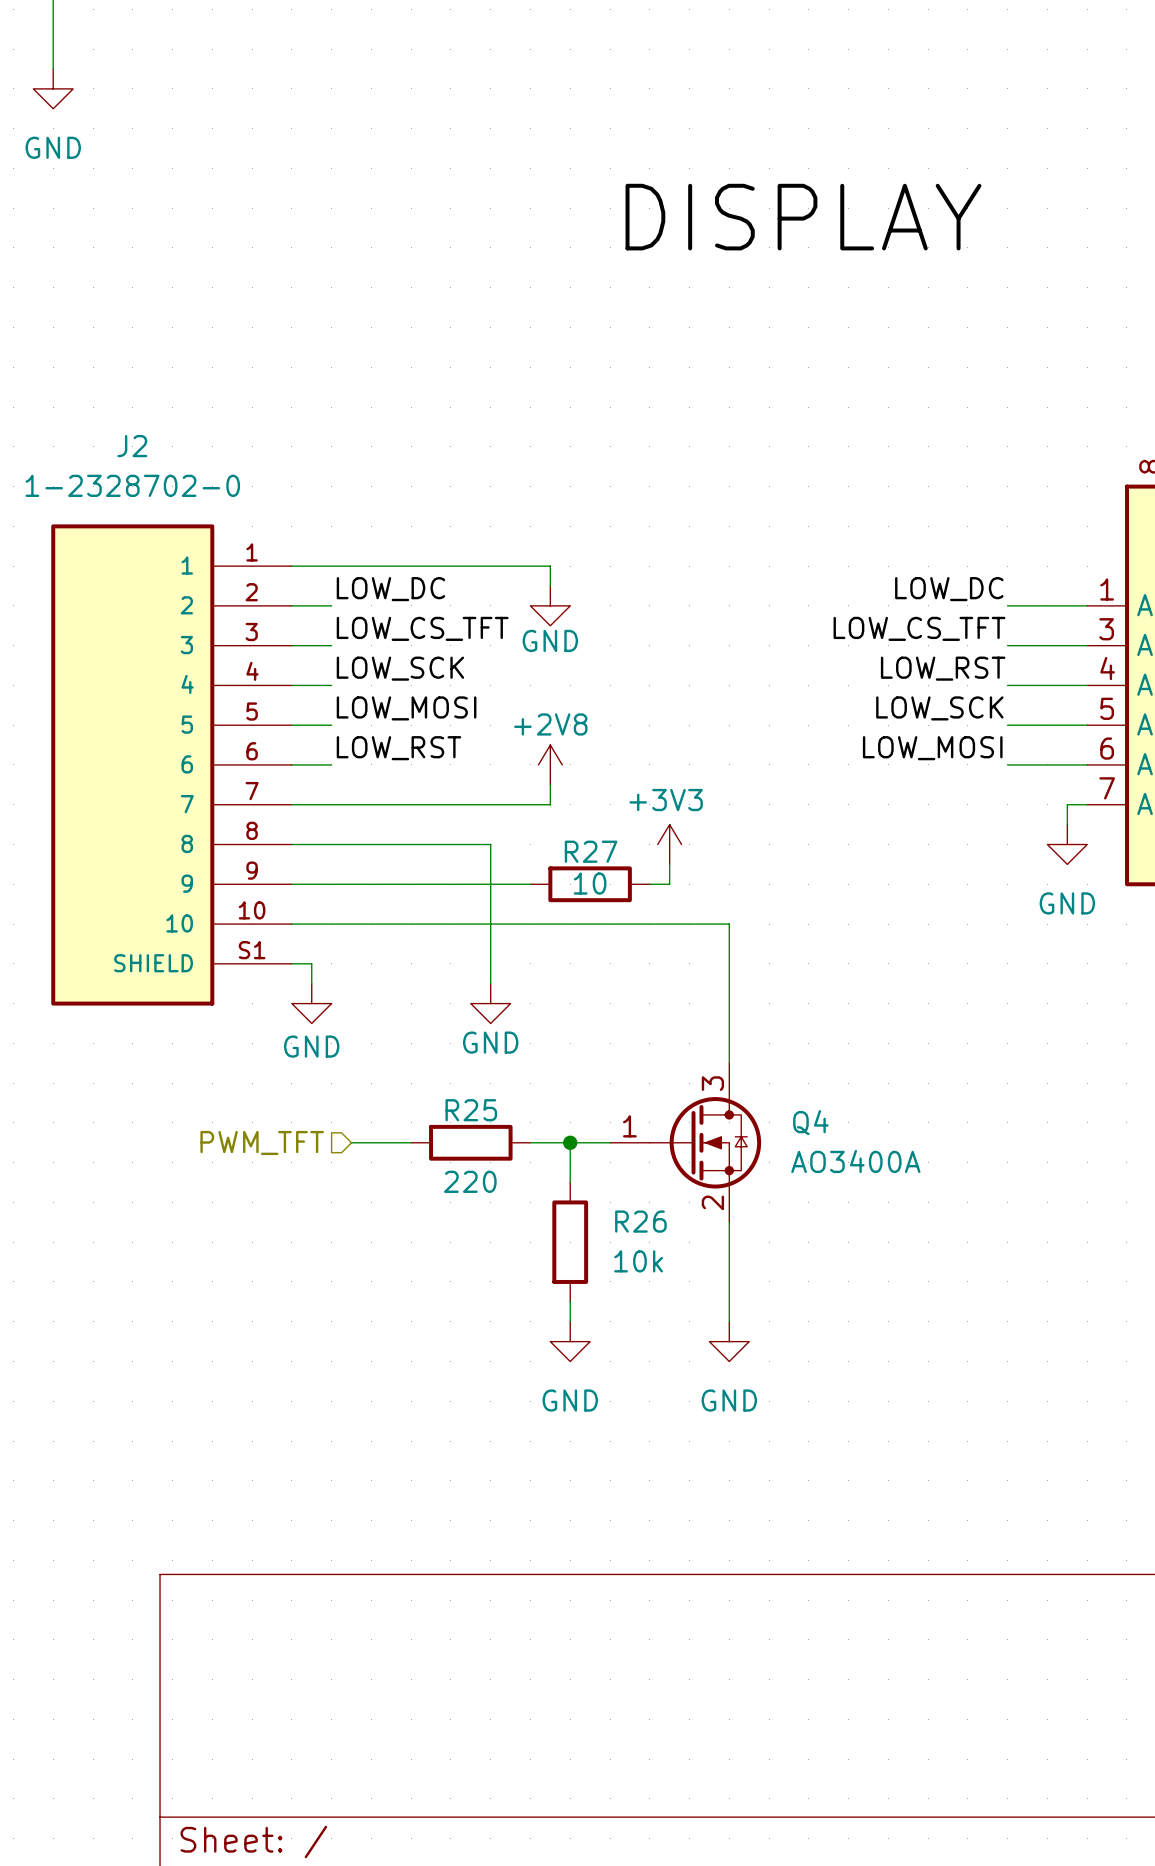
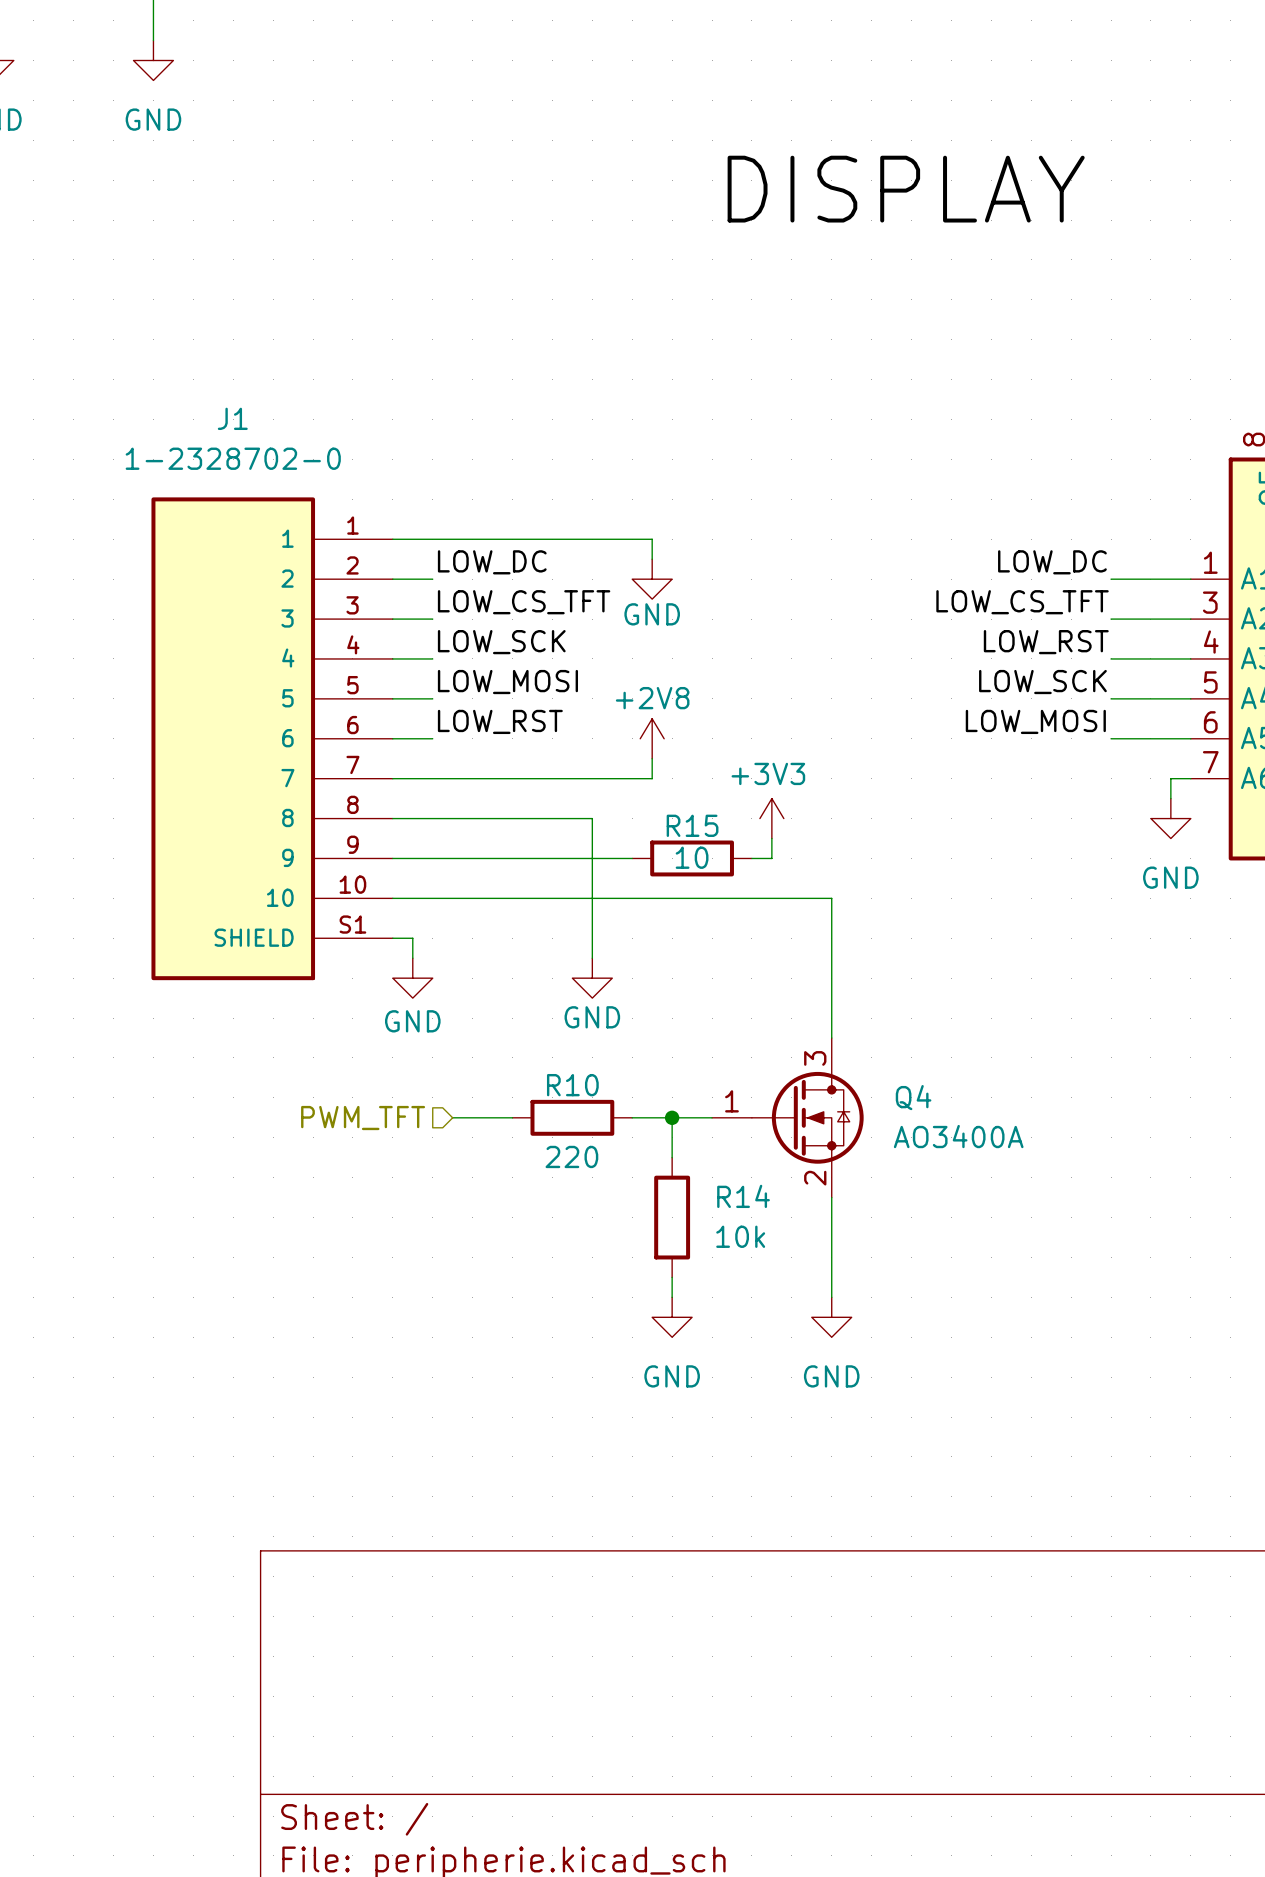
J2 name: J2 (132, 446) -> J1 (232, 418)
R27 name: R27 (591, 851) -> R15 (692, 825)
R25 name: R25 (471, 1110) -> R10 (572, 1085)
R26 name: R26 (640, 1221) -> R14 (743, 1196)

